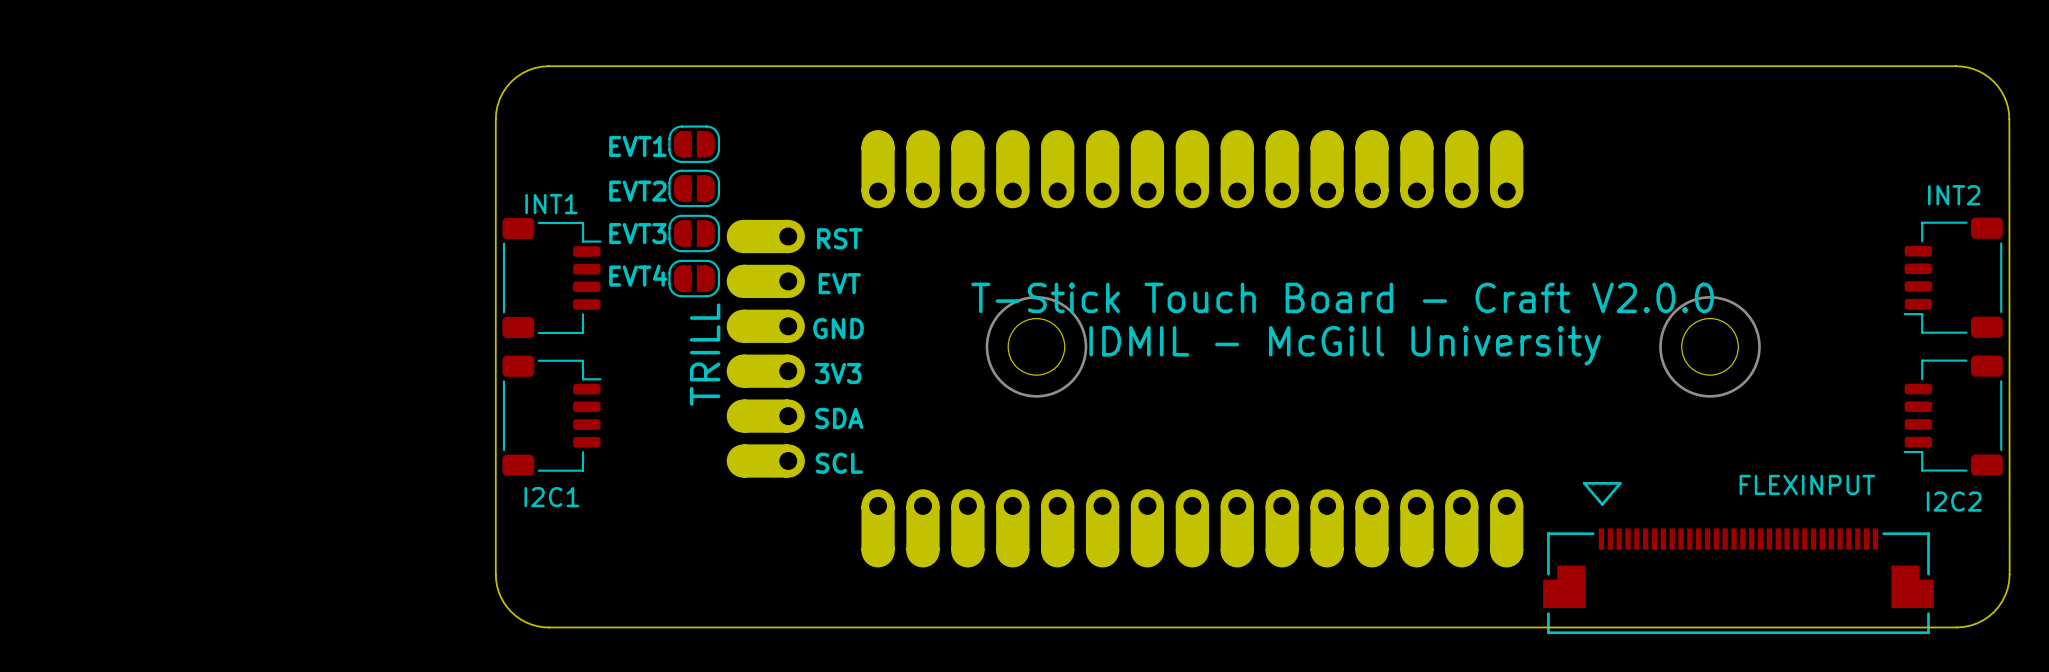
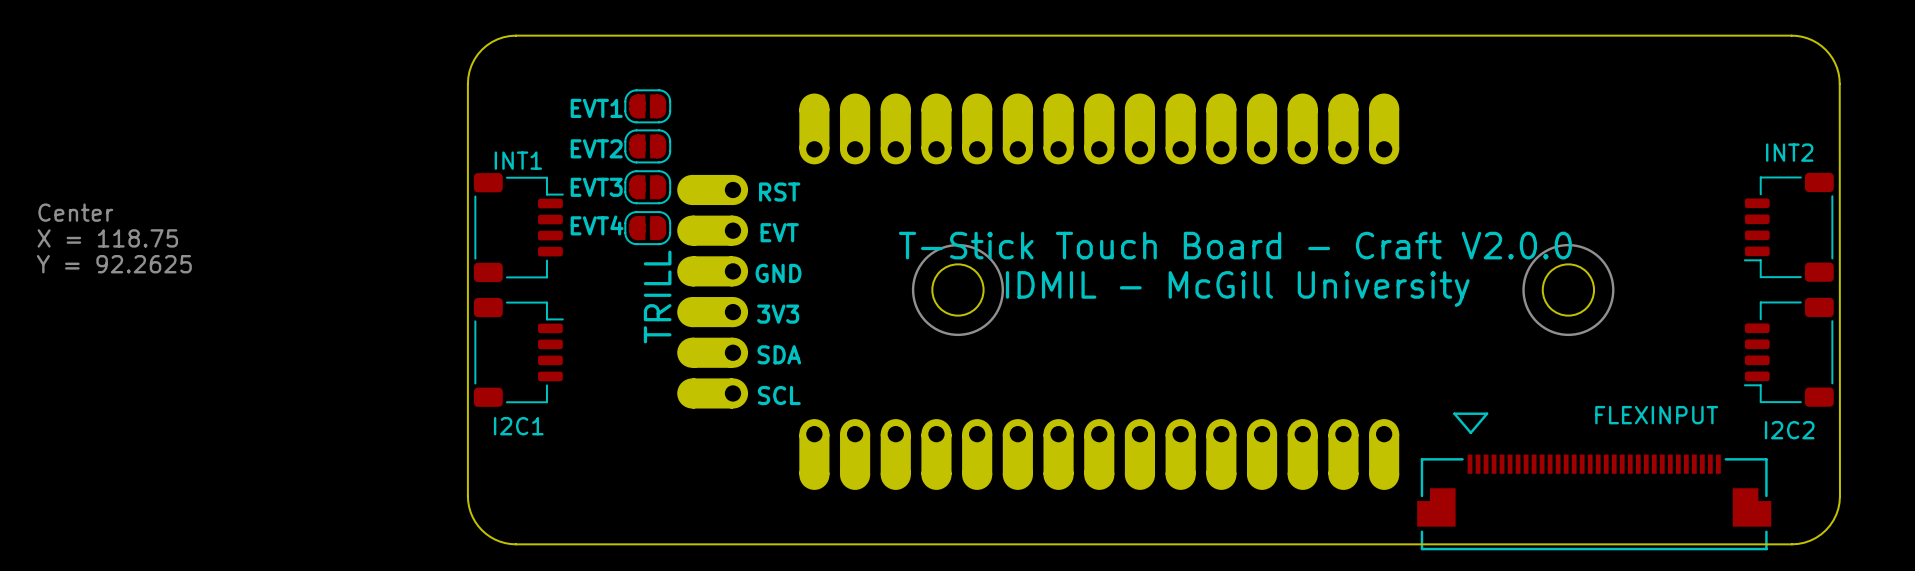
text: none -> Center (75, 212)
text: none -> X = 118.75 (107, 238)
text: none -> Y = 92.2625 (114, 264)

